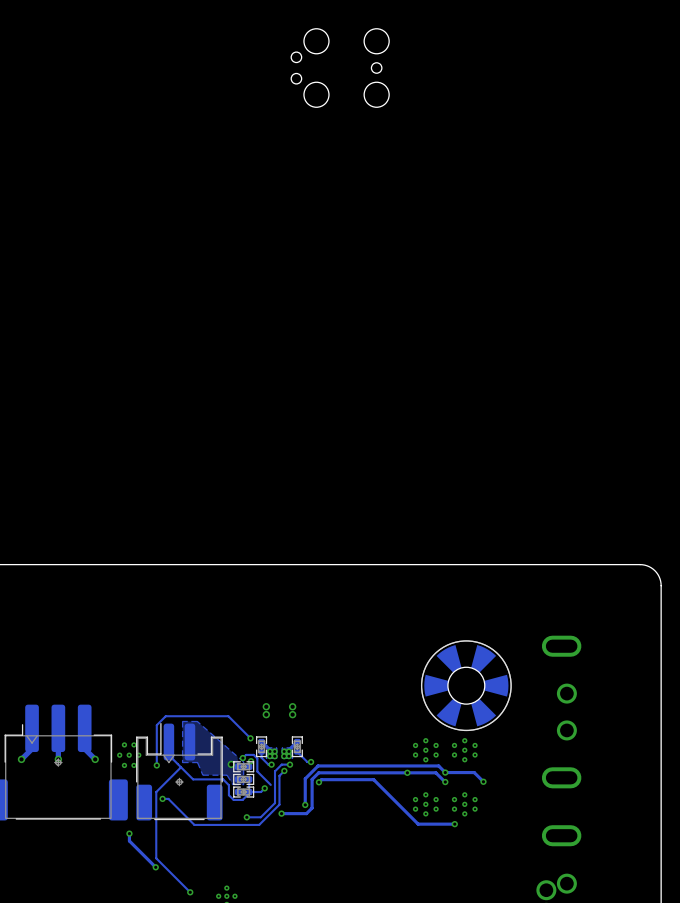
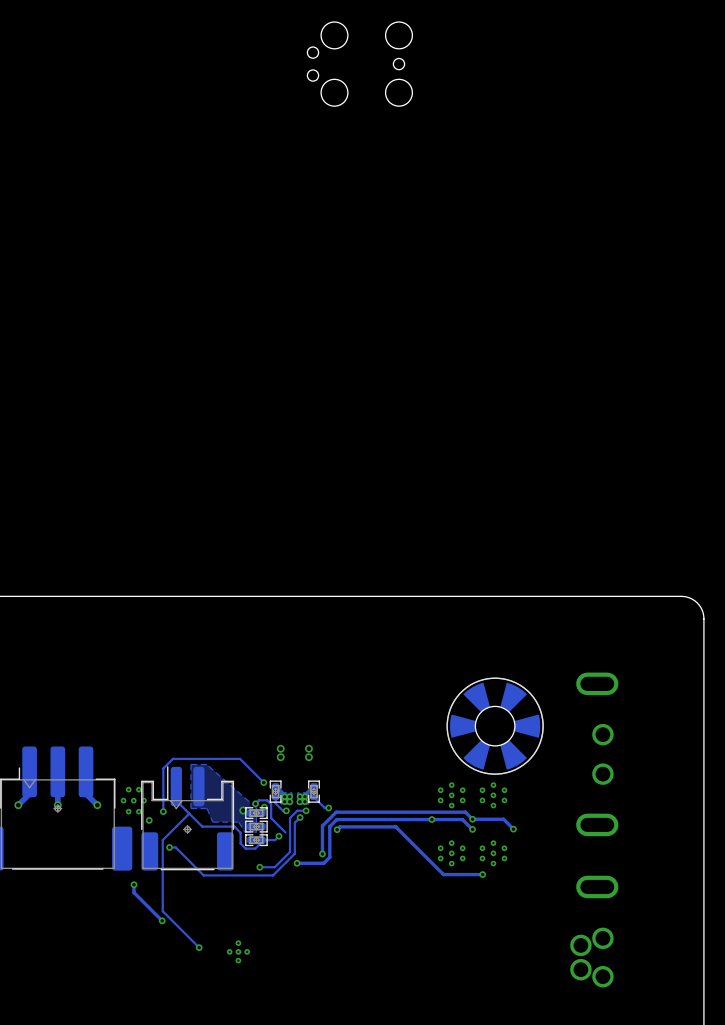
via: none -> (149, 820)

